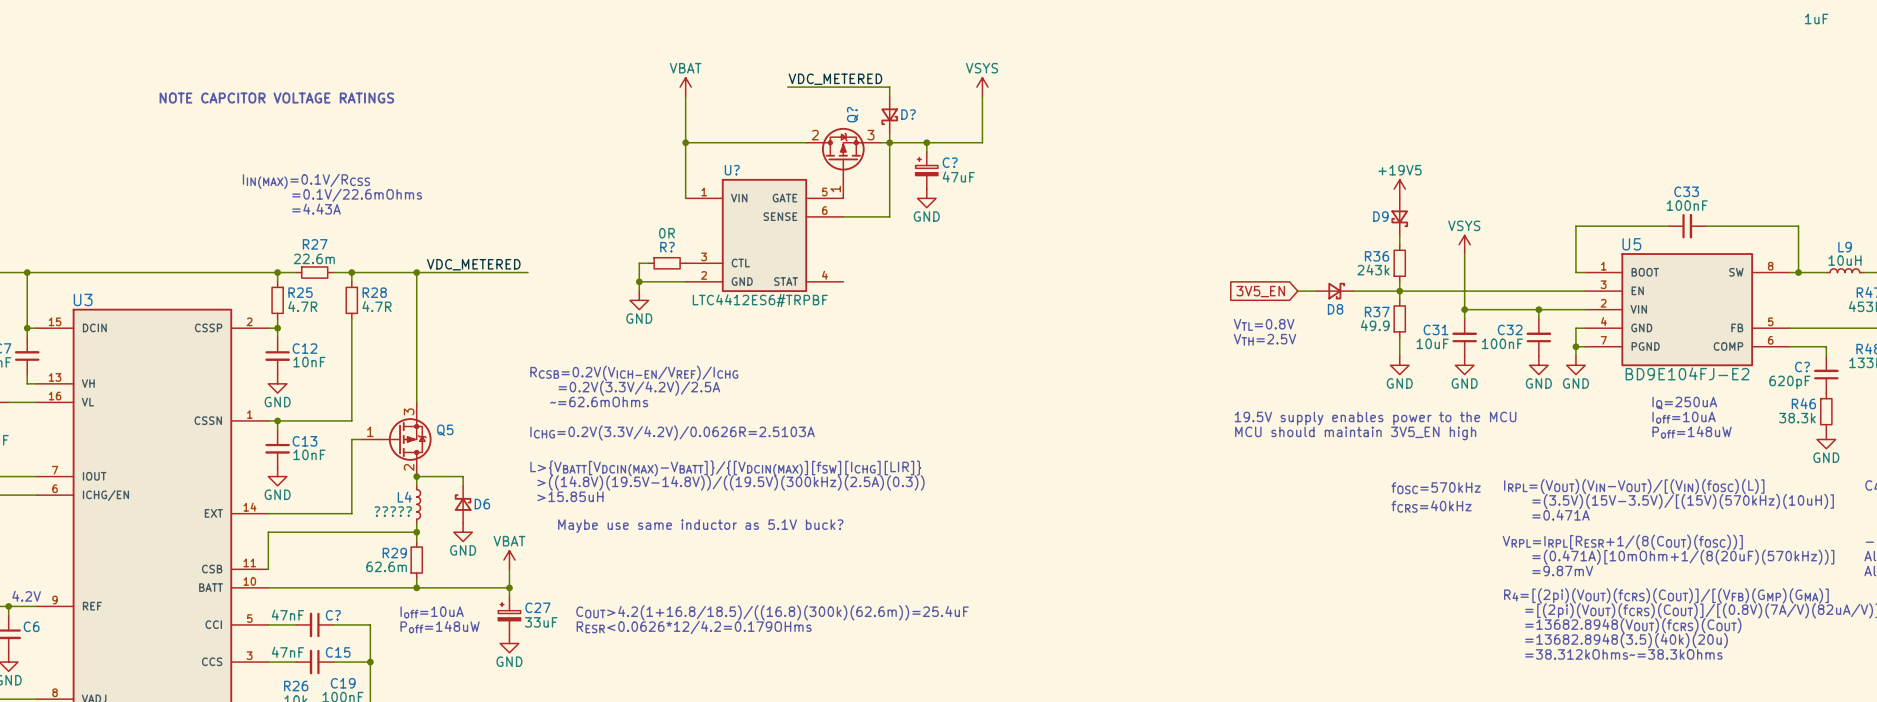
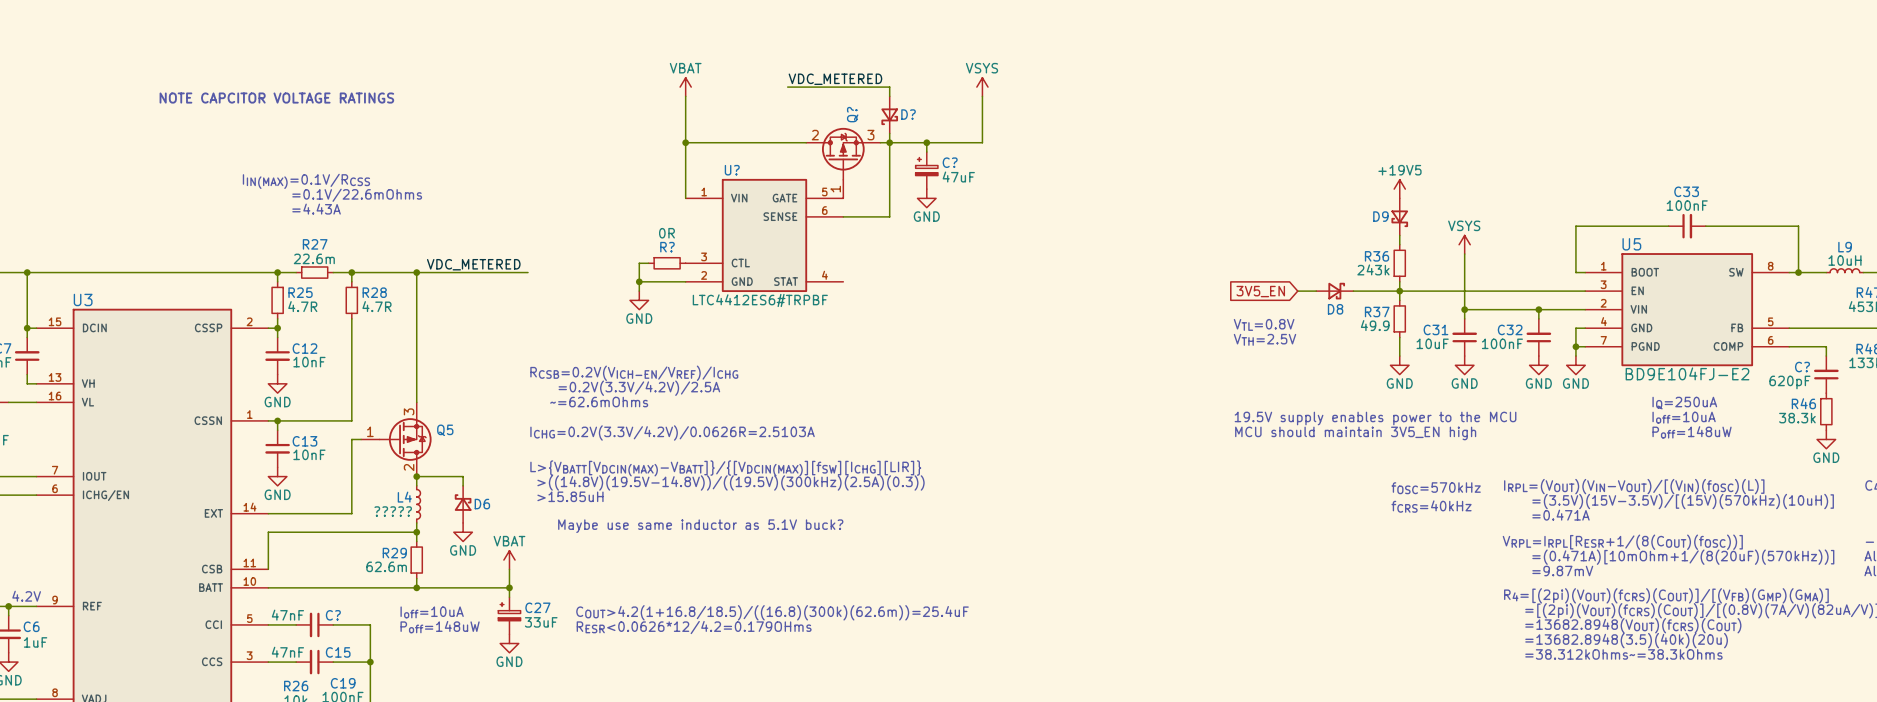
C6 value position: 1uF (1816, 18) -> 1uF (35, 642)

